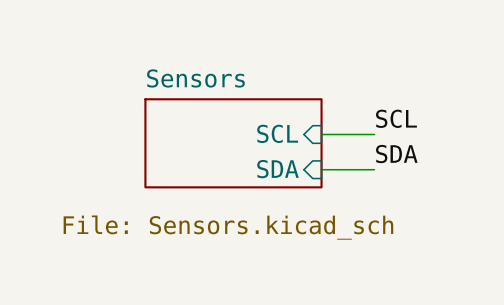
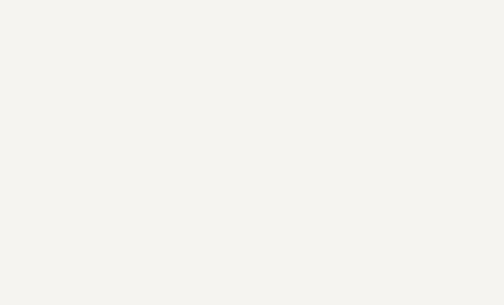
label: SCL (396, 118) -> none
sheet pin: SCL (277, 133) -> none
wire: (321, 134) (374, 134) -> none
sheet Sensors: File: Sensors.kicad_sch (233, 143) -> none
label: SDA (396, 154) -> none
sheet pin: SDA (277, 169) -> none
wire: (321, 169) (374, 169) -> none

